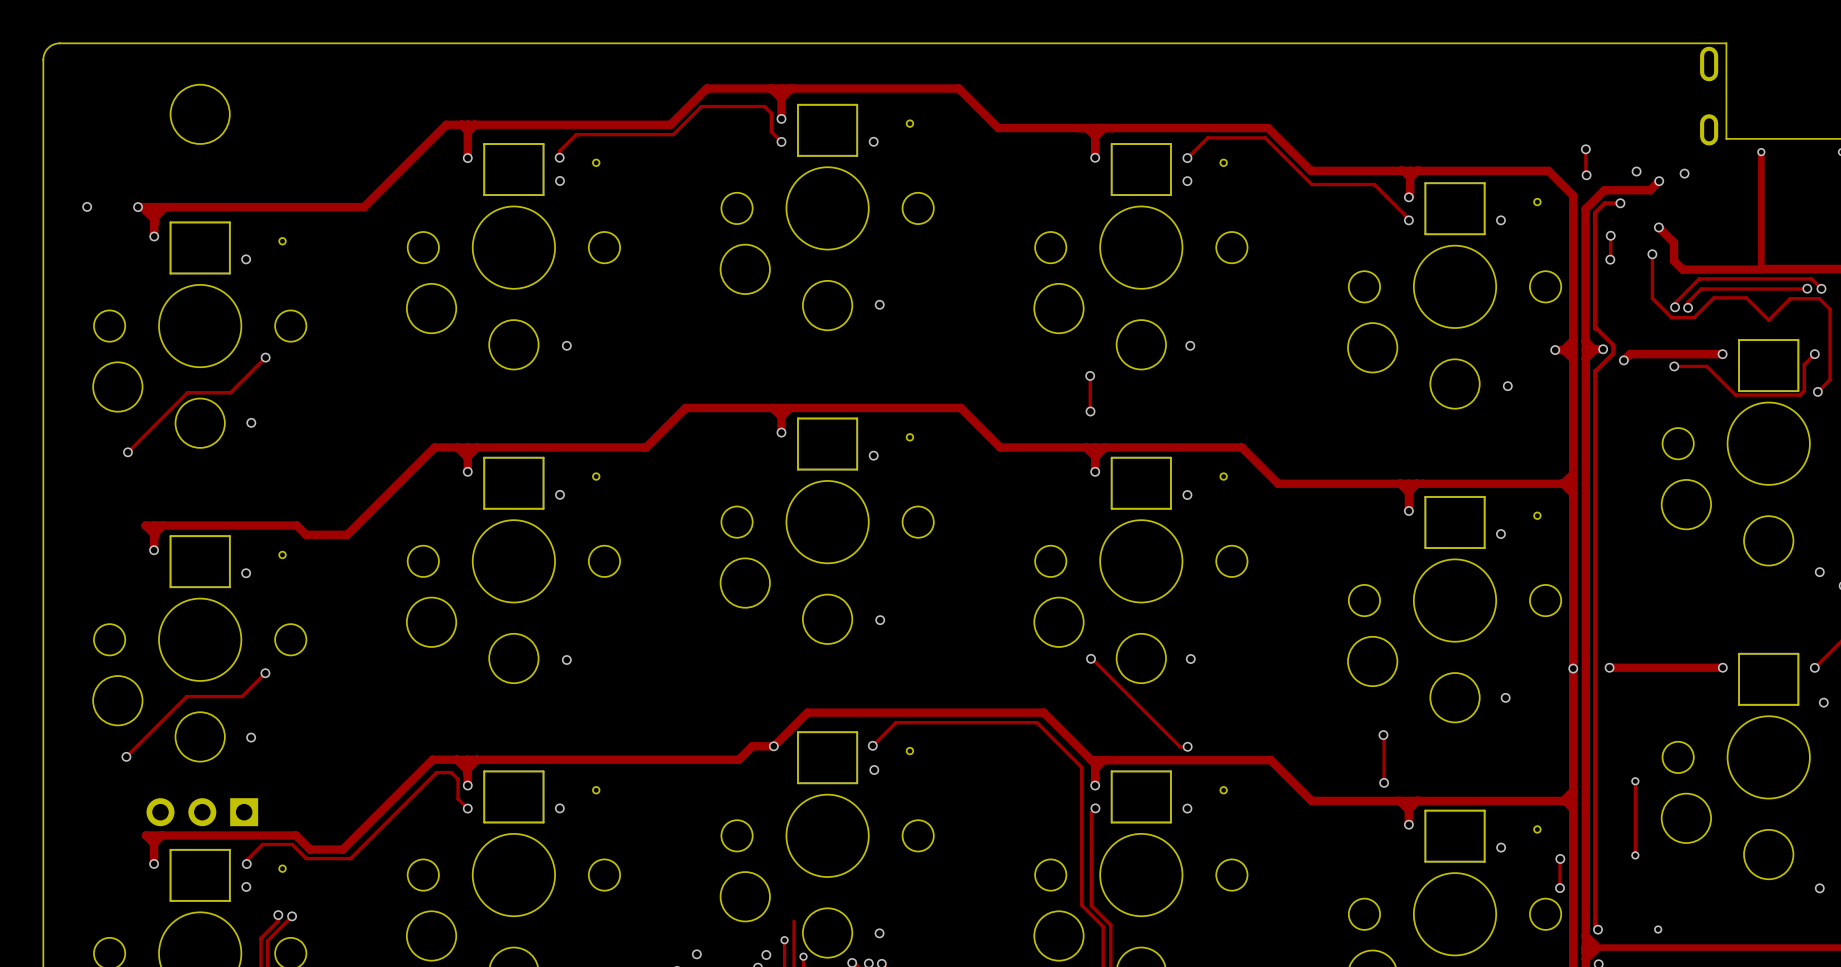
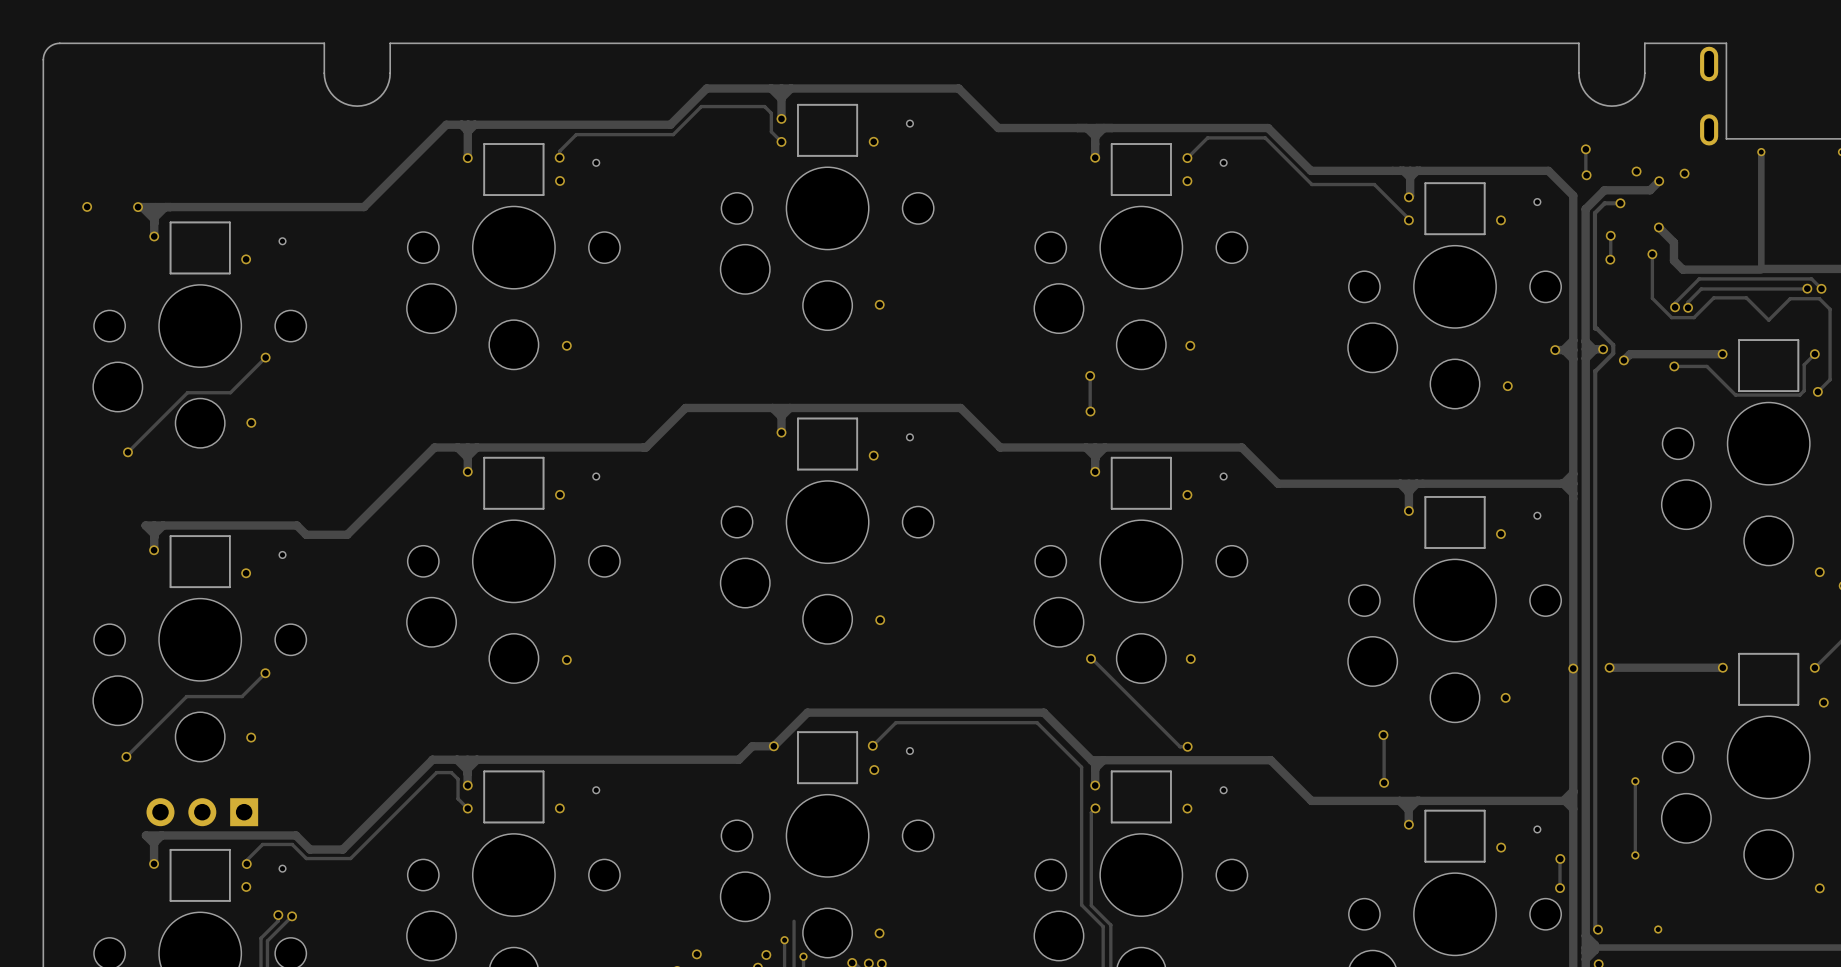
board edge: (324, 43) (390, 43) -> (324, 43) (324, 77) (328, 89) (340, 101) (357, 106) (373, 101) (385, 89) (389, 77) (390, 43)
board edge: (1578, 43) (1644, 43) -> (1578, 43) (1579, 77) (1583, 89) (1595, 101) (1611, 106) (1628, 101) (1640, 89) (1644, 77) (1644, 43)
round board edge: [169, 83, 231, 145] -> none

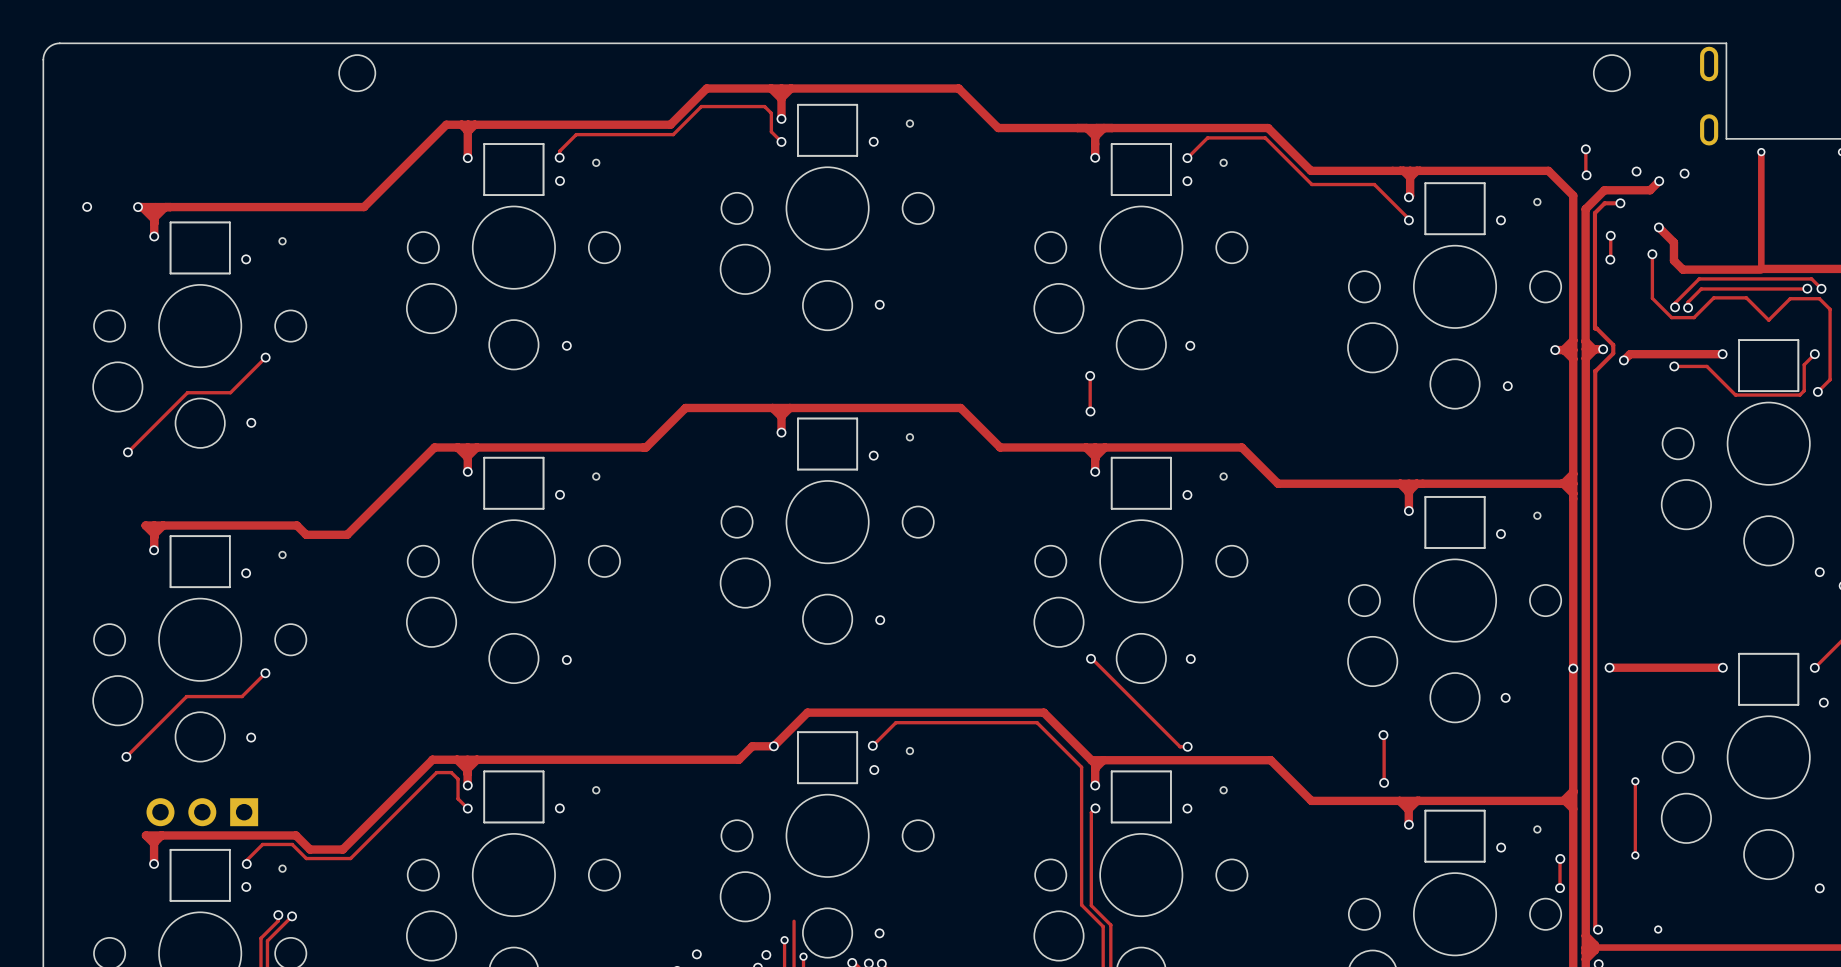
board edge: (324, 43) (324, 77) (328, 89) (340, 101) (357, 106) (373, 101) (385, 89) (389, 77) (390, 43) -> (324, 43) (390, 43)
board edge: (1578, 43) (1579, 77) (1583, 89) (1595, 101) (1611, 106) (1628, 101) (1640, 89) (1644, 77) (1644, 43) -> (1578, 43) (1644, 43)
round board edge: none -> [338, 54, 377, 93]
round board edge: none -> [1592, 54, 1631, 93]

